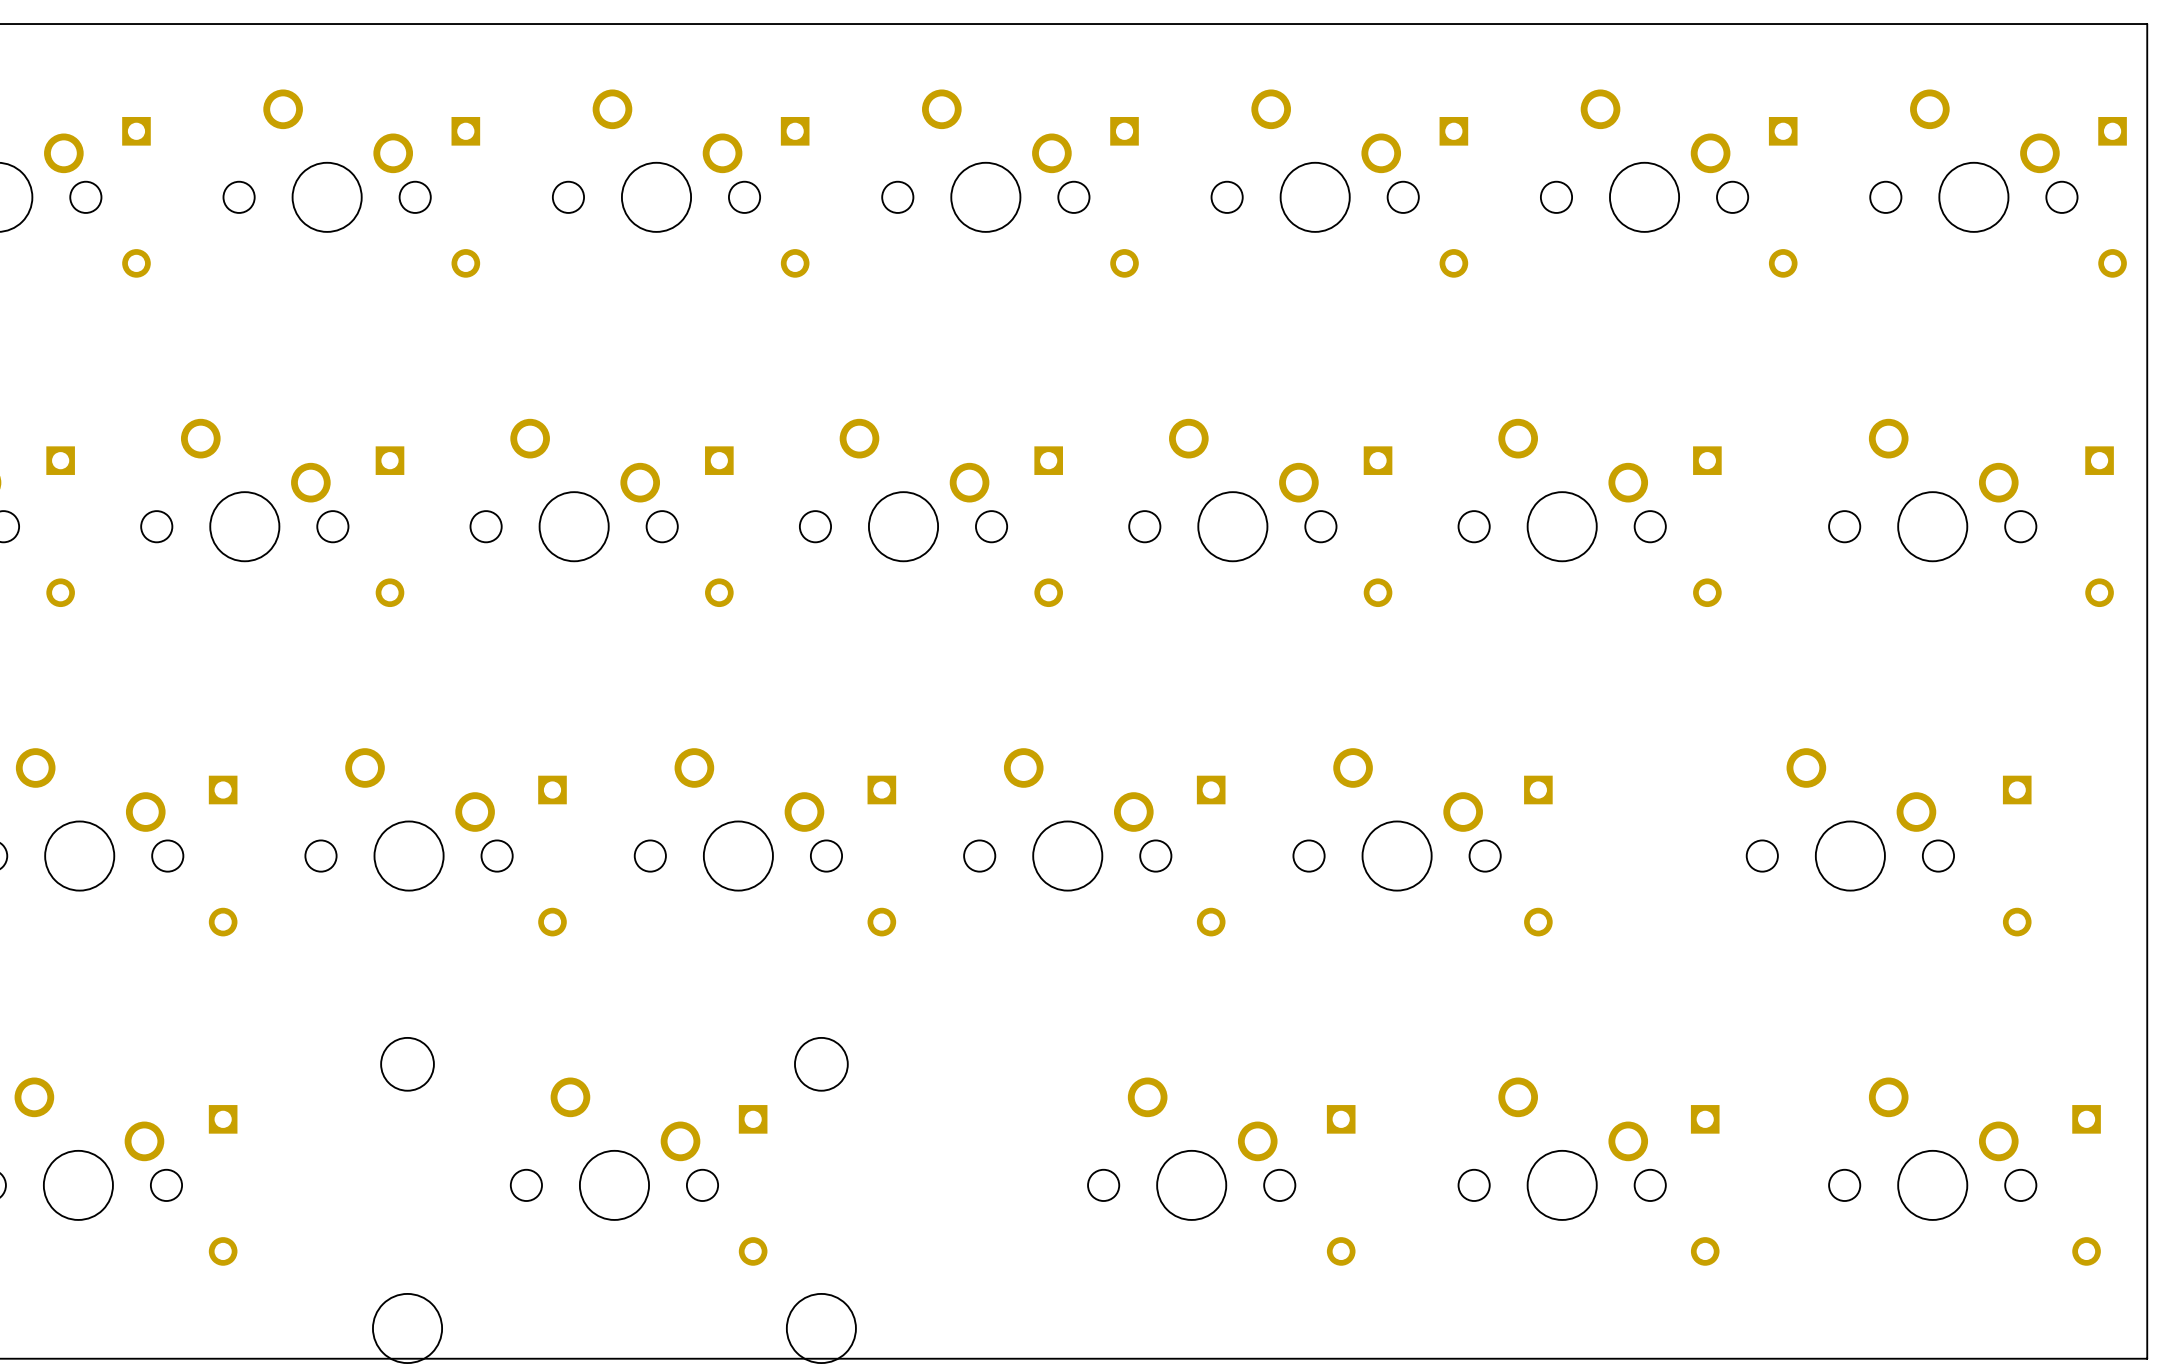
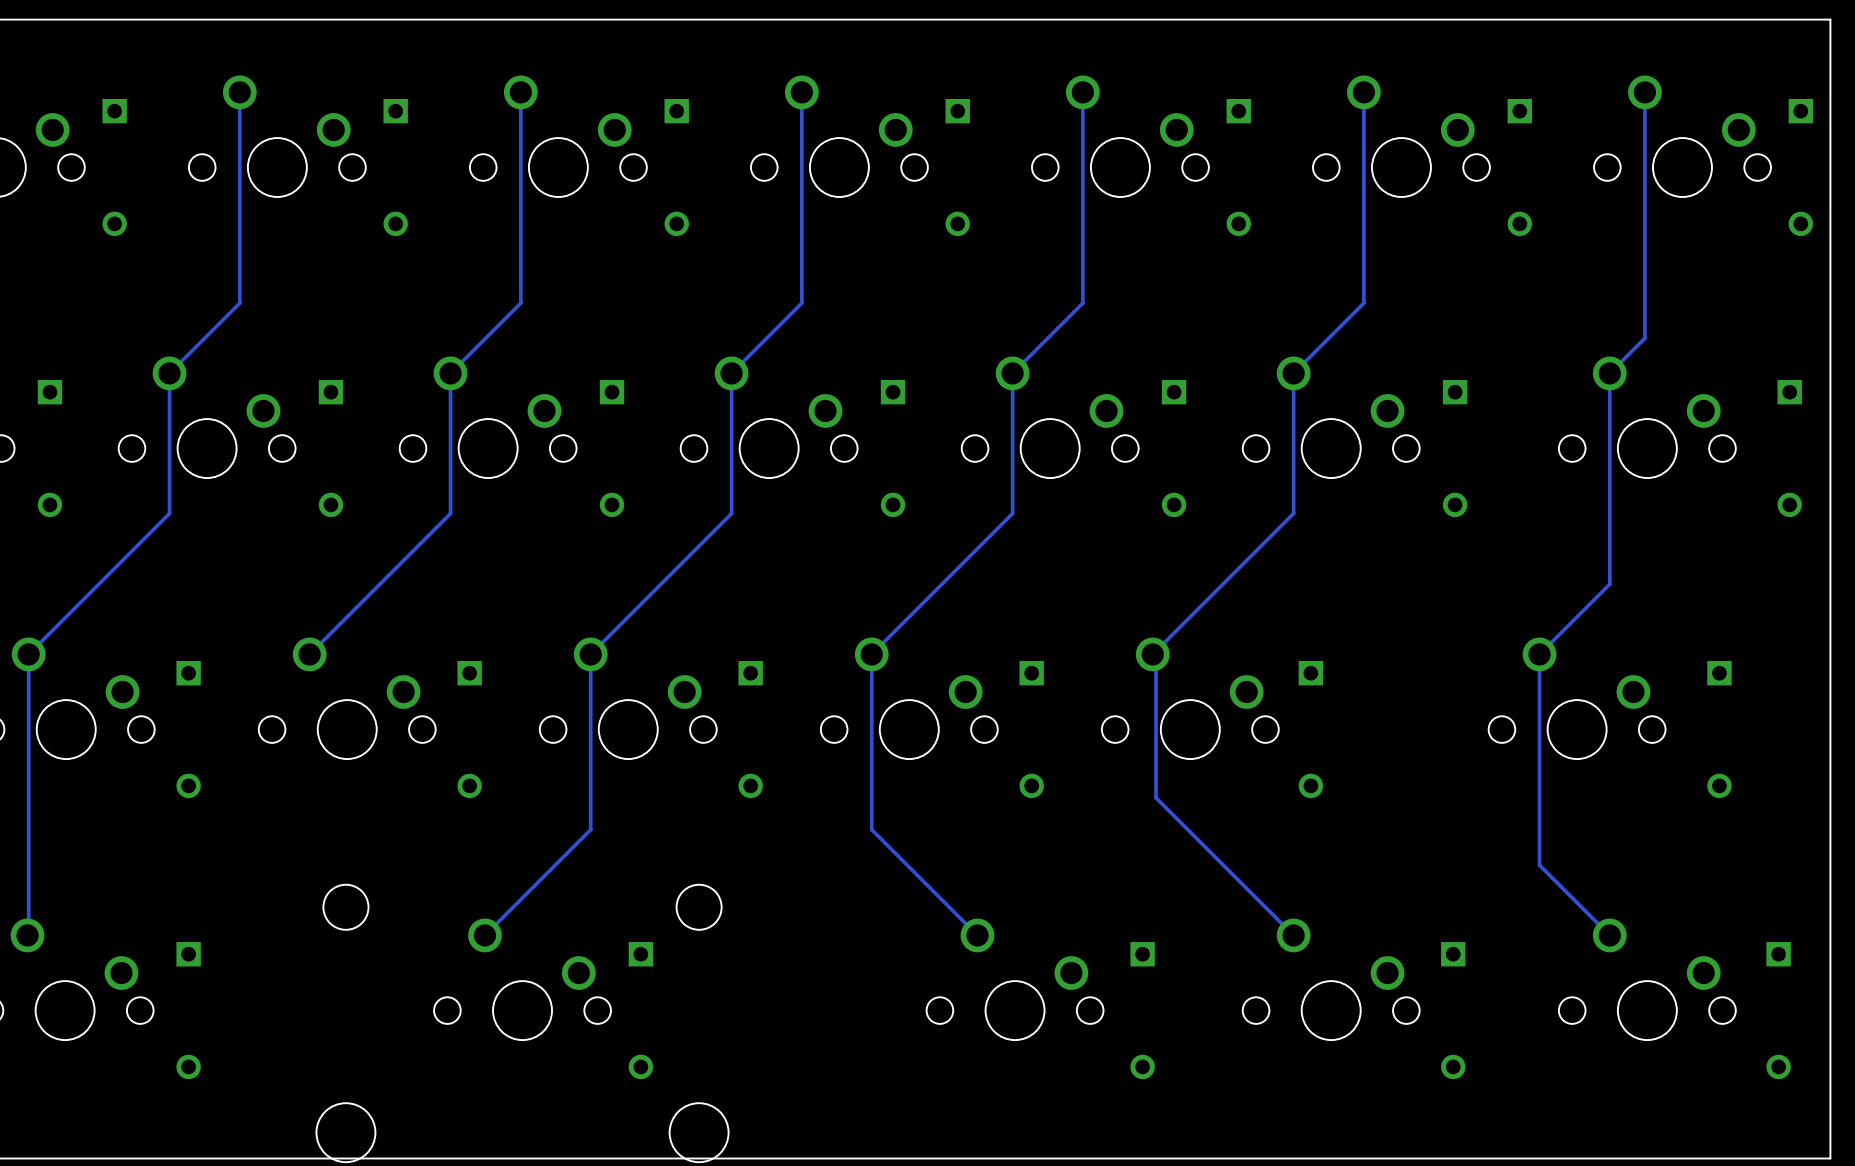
track: none -> (239, 92) (239, 303) (169, 373) (169, 513) (28, 654) (27, 935)
track: none -> (520, 92) (520, 303) (450, 373) (450, 513) (309, 654)
track: none -> (801, 92) (801, 303) (731, 373) (731, 513) (590, 654) (590, 829) (484, 935)
track: none -> (1082, 92) (1082, 303) (1012, 373) (1012, 513) (871, 654) (871, 829) (977, 935)
track: none -> (1363, 92) (1363, 303) (1293, 373) (1293, 513) (1152, 654) (1156, 657) (1156, 797) (1293, 935)
track: none -> (1644, 92) (1644, 338) (1609, 373) (1609, 584) (1539, 654) (1539, 865) (1609, 935)

